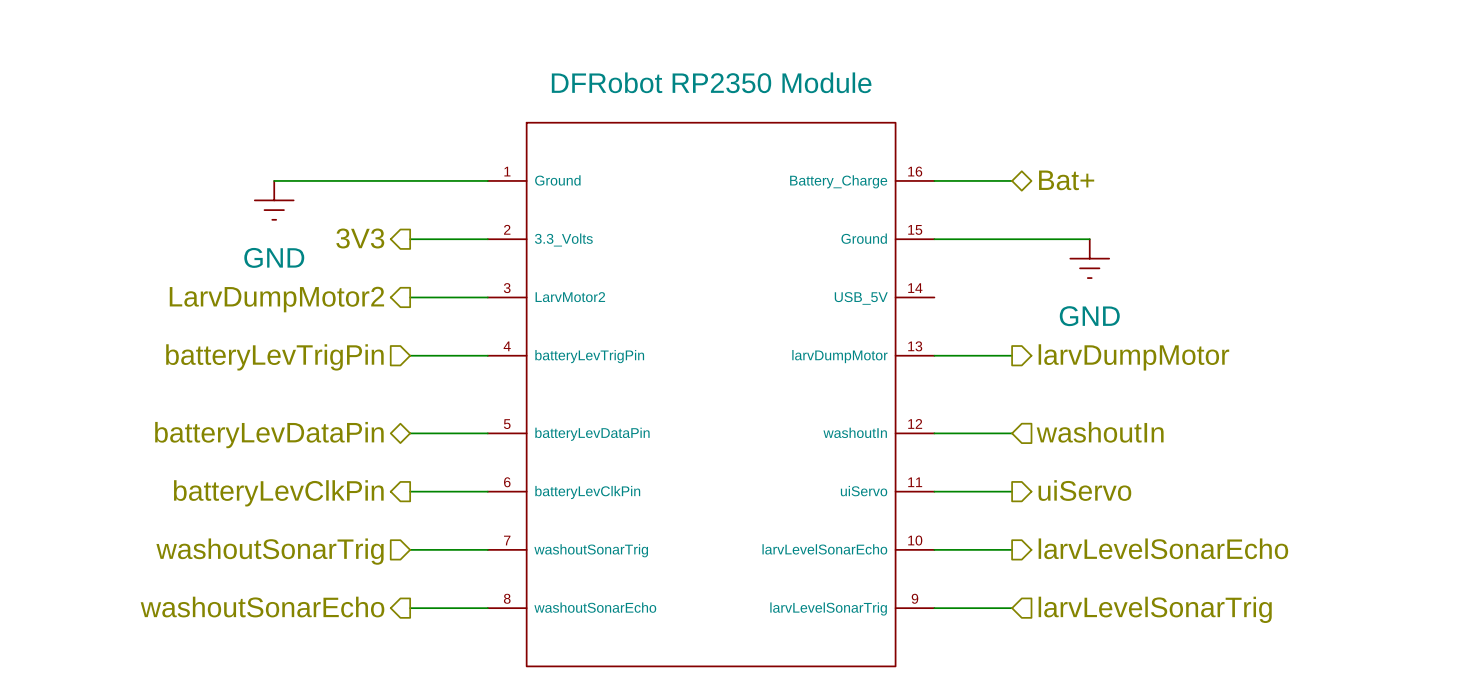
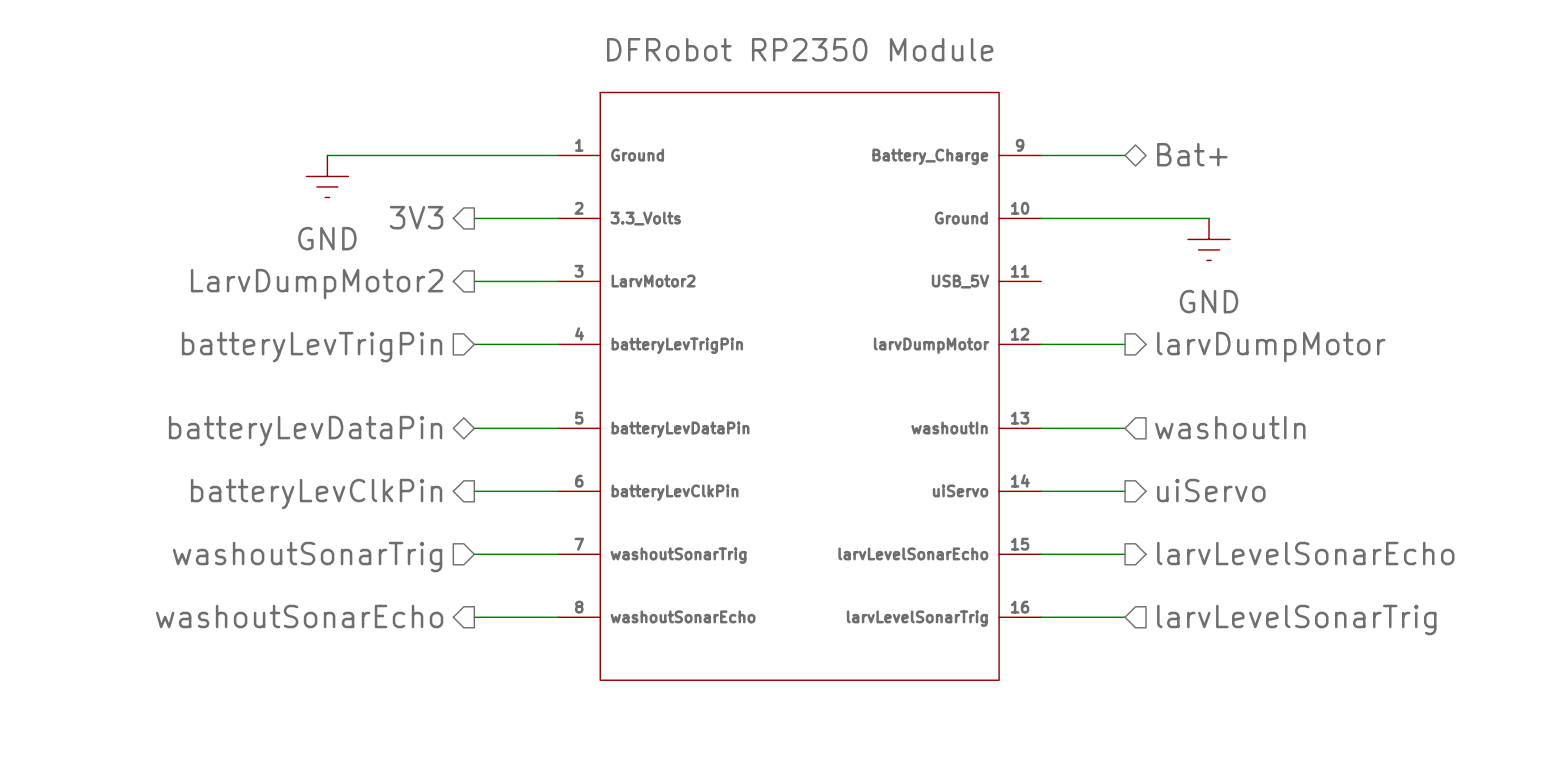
part pin number: 16 (915, 171) -> 9 (1020, 145)
part pin number: 15 (915, 229) -> 10 (1020, 208)
part pin number: 14 (915, 288) -> 11 (1020, 271)
part pin number: 13 (915, 346) -> 12 (1020, 334)
part pin number: 12 (915, 423) -> 13 (1020, 418)
part pin number: 11 (915, 482) -> 14 (1020, 480)
part pin number: 10 (915, 540) -> 15 (1020, 544)
part pin number: 9 (914, 598) -> 16 (1020, 607)

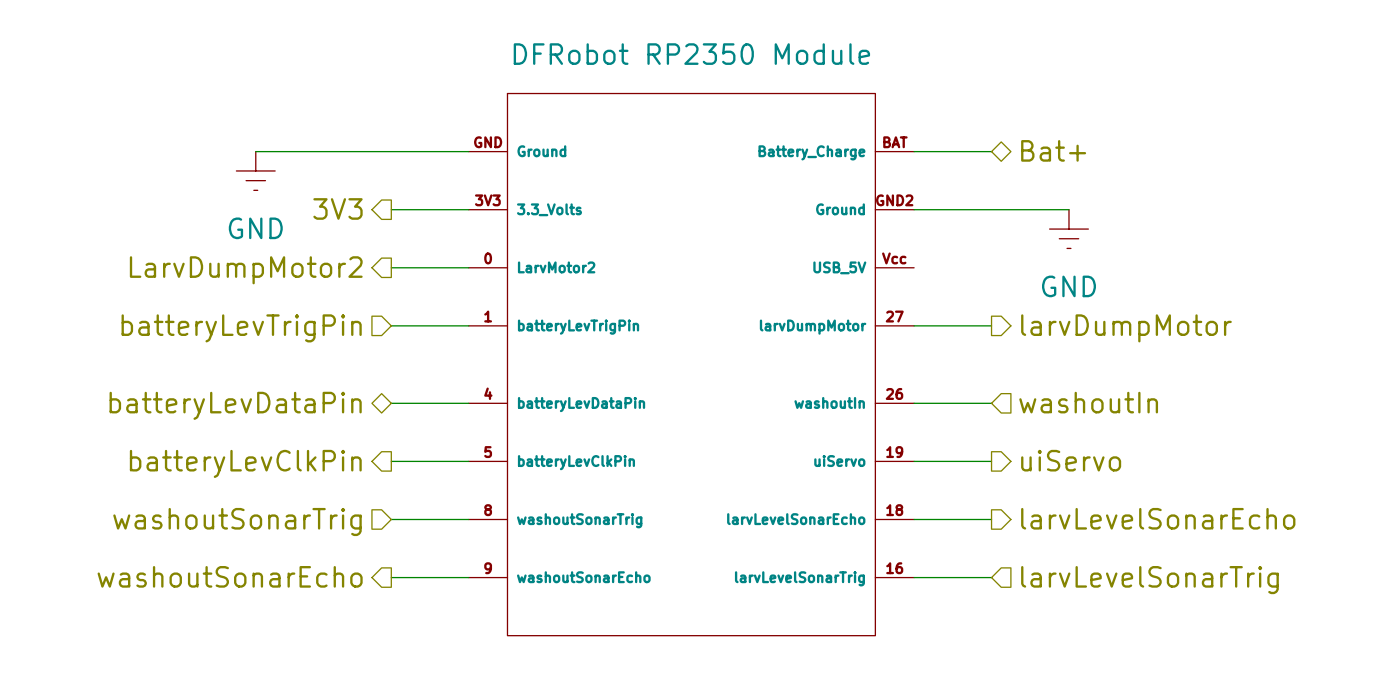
part symbol: [558, 92, 1042, 681] -> [468, 93, 915, 636]

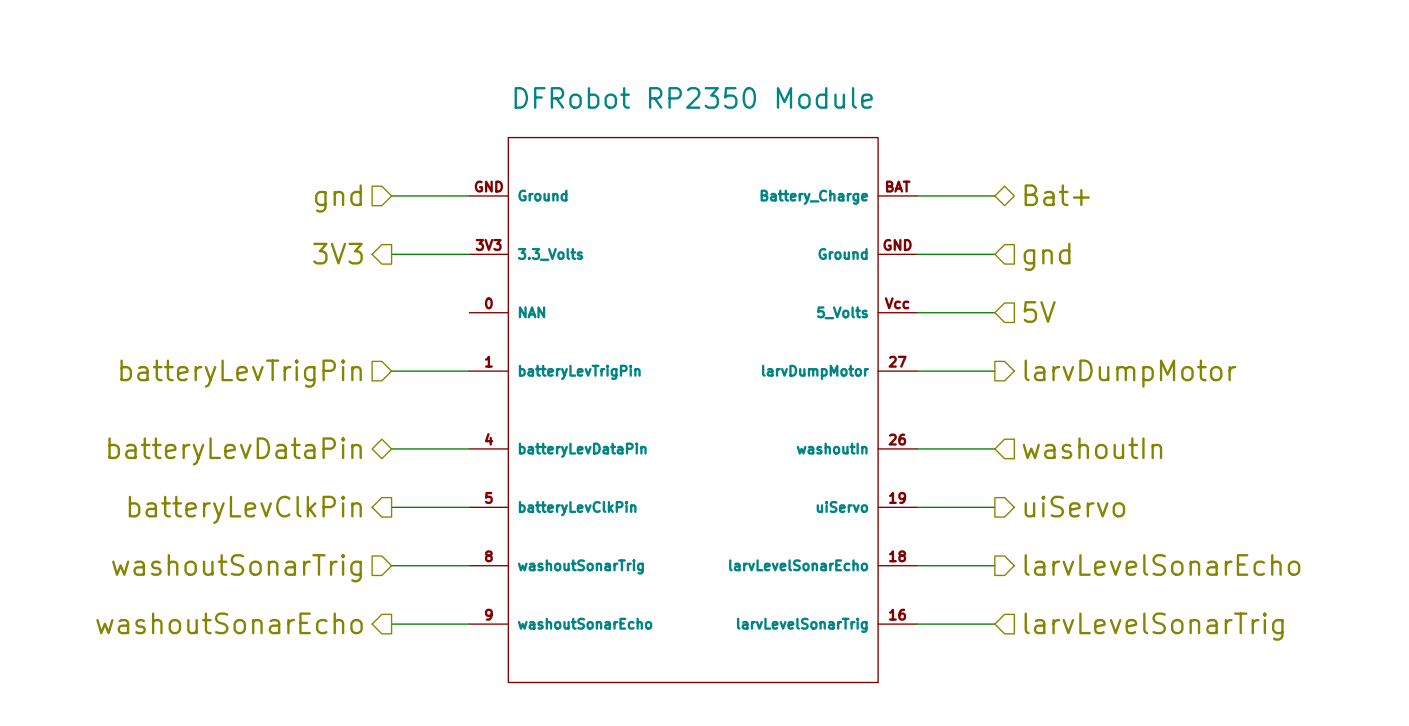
wire: (255, 151) (391, 151) -> none
hierarchical label: none -> gnd (338, 198)
power symbol: GND (255, 170) -> none
part pin number: GND2 (894, 200) -> GND (897, 244)
wire: (991, 209) (1068, 209) -> (917, 312) (994, 312)
hierarchical label: none -> gnd (1047, 256)
power symbol: GND (1068, 229) -> none
wire: (391, 267) (468, 267) -> none
part pin name: LarvMotor2 (556, 267) -> NAN (532, 312)
part pin name: USB_5V (839, 267) -> 5_Volts (842, 312)
hierarchical label: none -> 5V (1039, 312)
hierarchical label: LarvDumpMotor2 (246, 270) -> none

